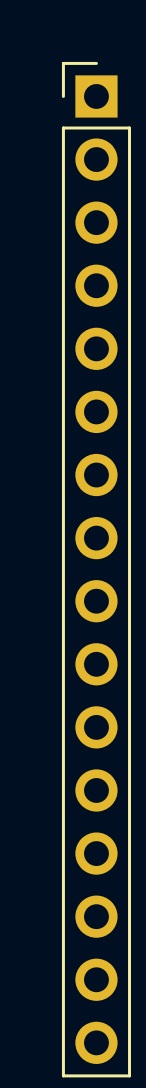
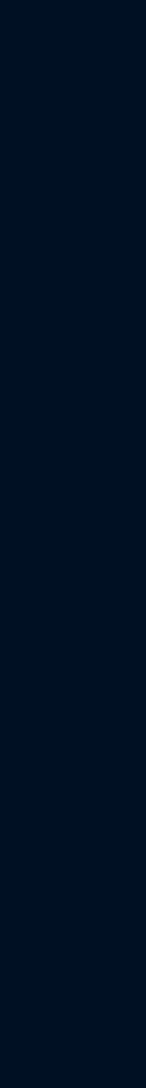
part: (96, 569) -> none

